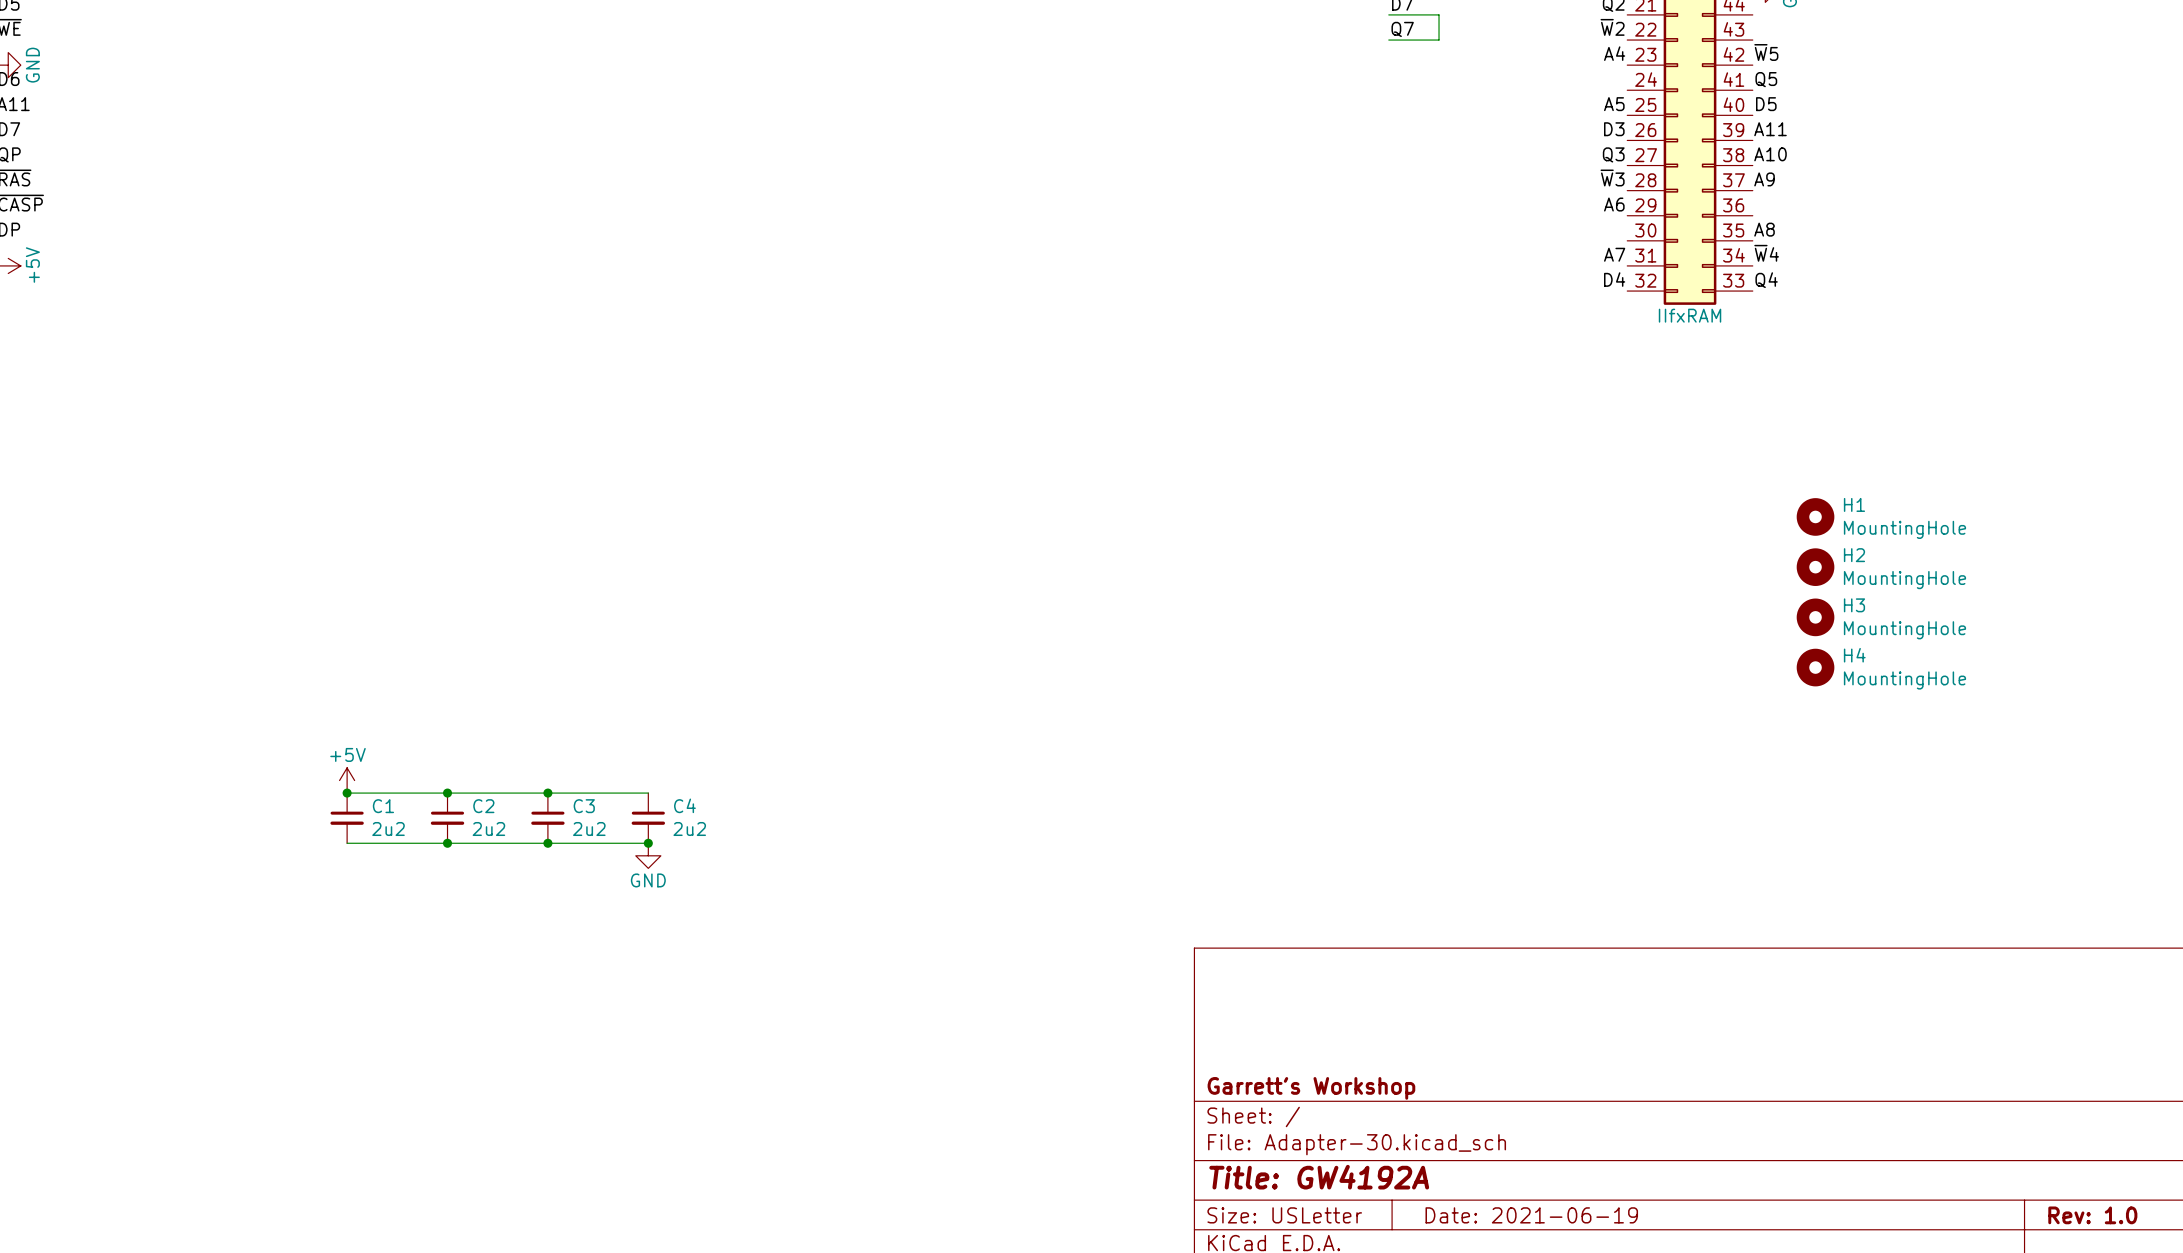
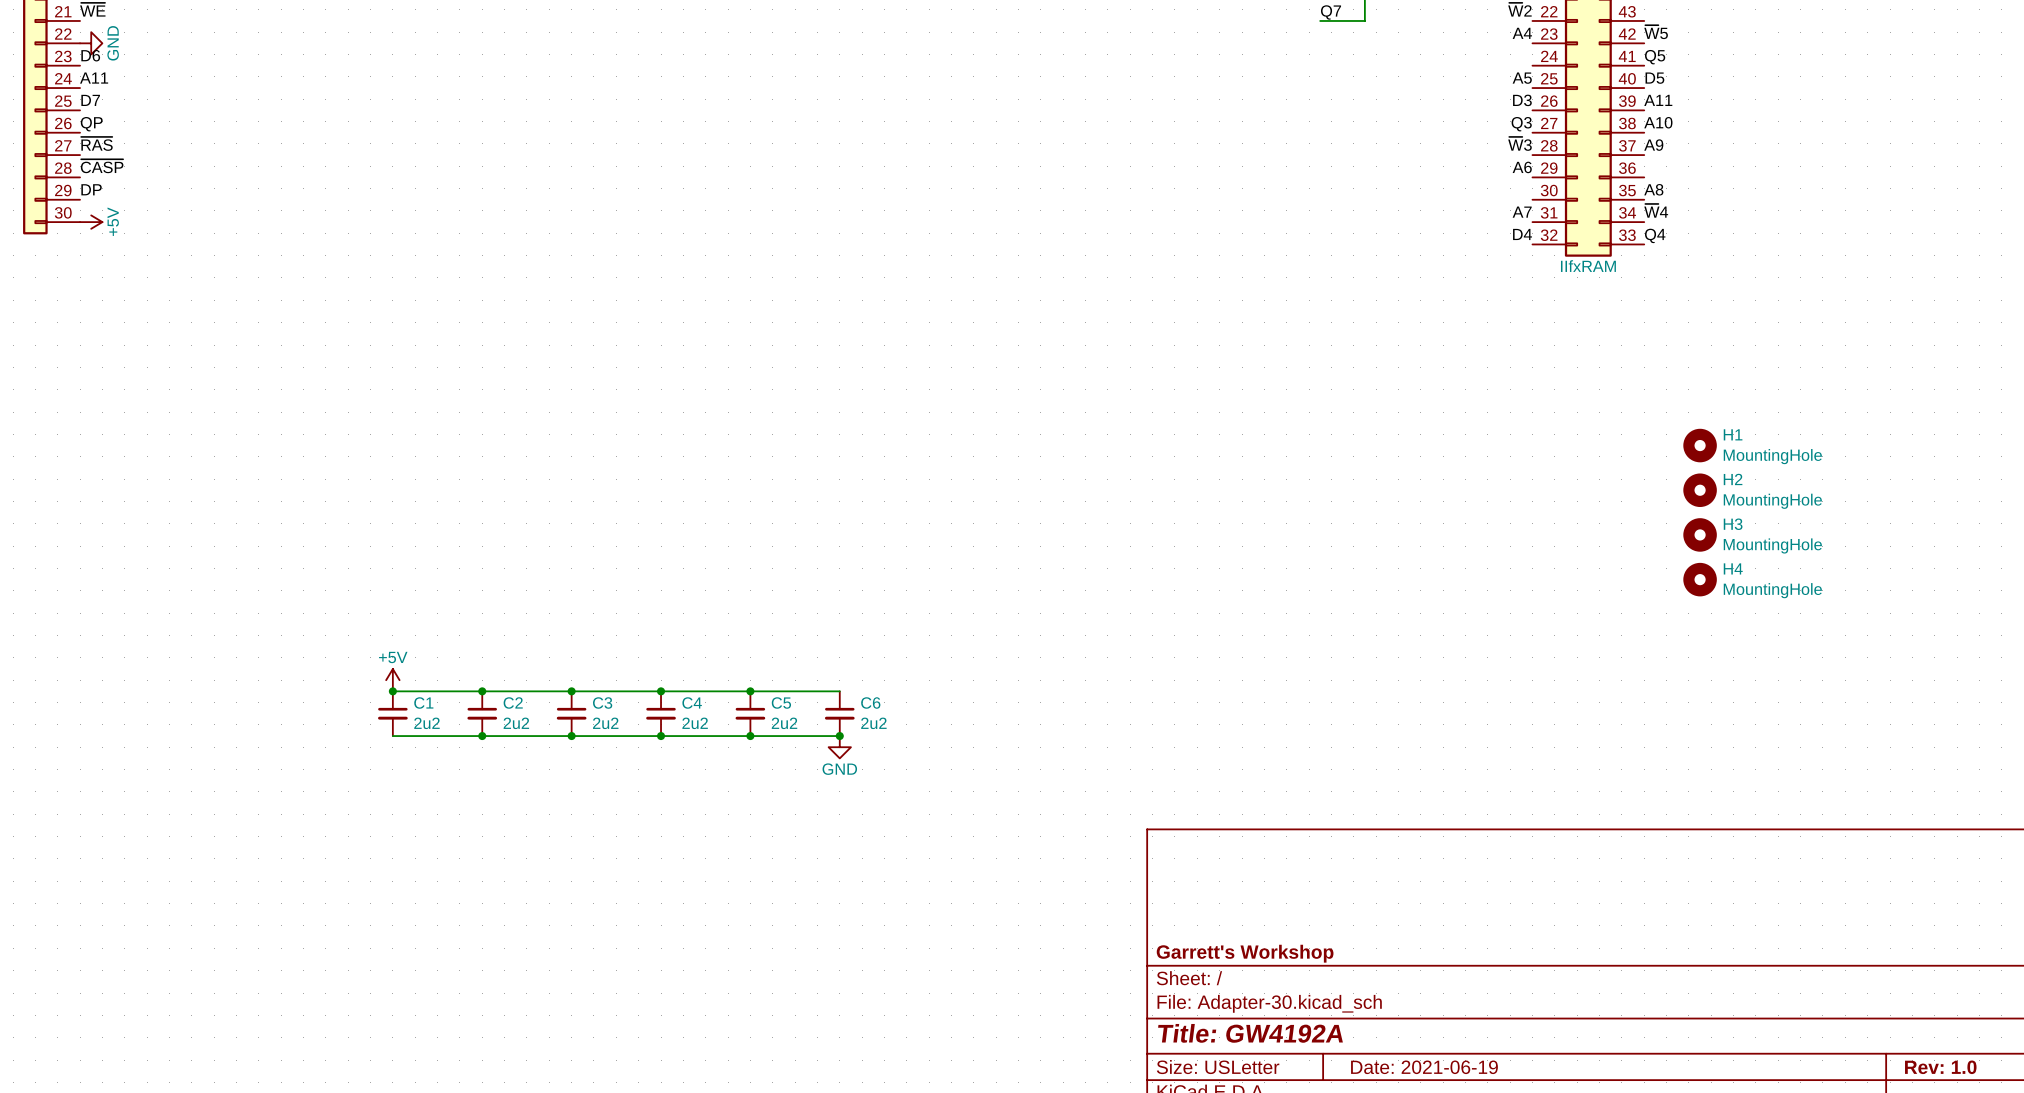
wire: none -> (661, 691) (839, 691)
junction: none -> (661, 691)
junction: none -> (750, 691)
C5: none -> 2u2 (750, 713)
C6: none -> 2u2 (839, 713)
wire: none -> (661, 736) (839, 736)
junction: none -> (750, 736)
junction: none -> (839, 736)
power symbol position: GND (648, 855) -> GND (839, 747)

